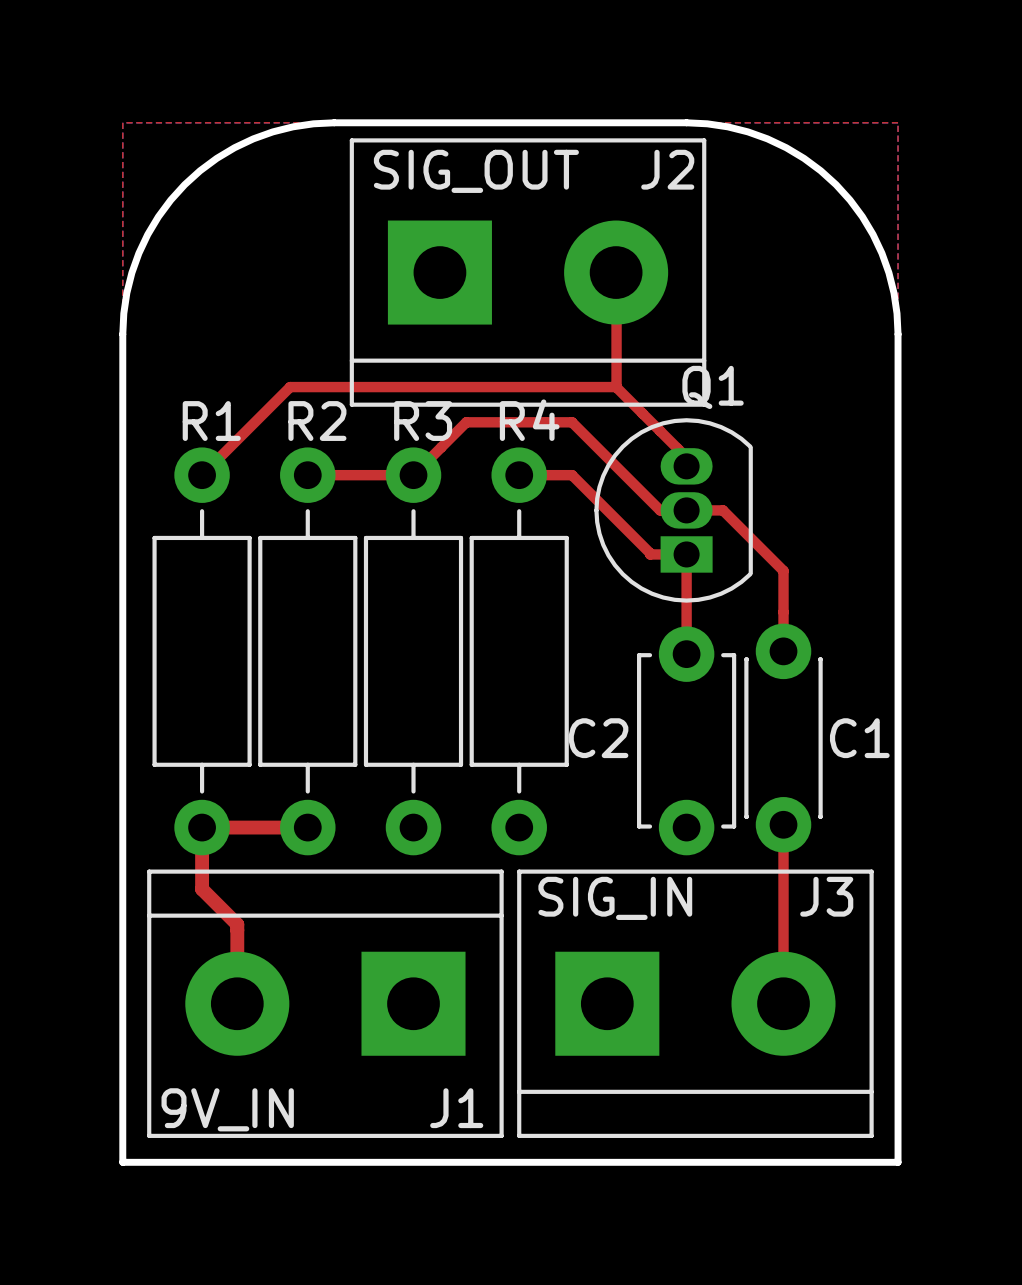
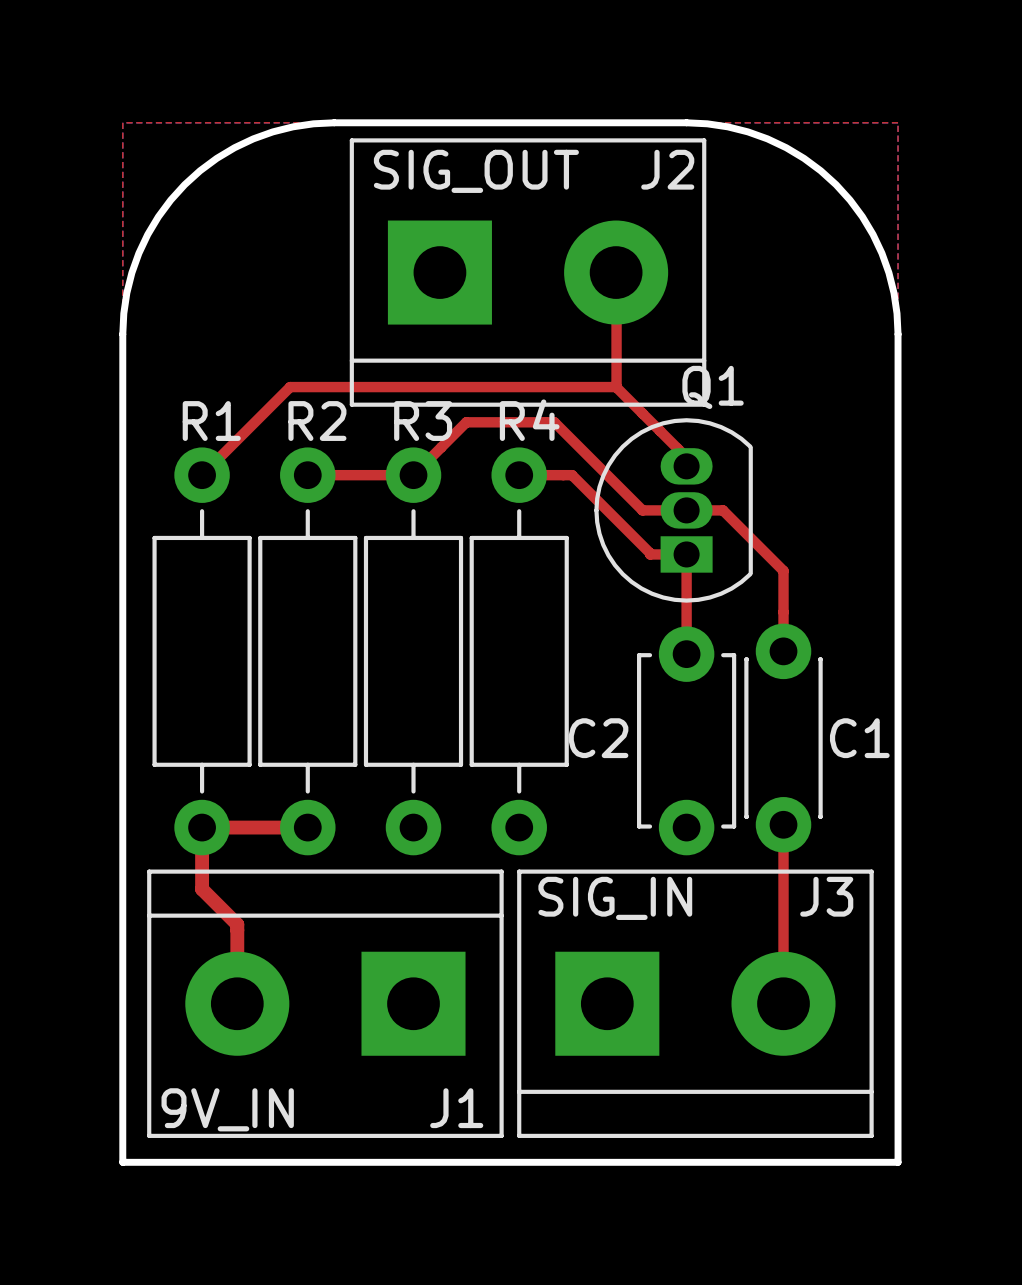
top track: (554, 422) (572, 422) (660, 510) -> (554, 422) (642, 510) (660, 510)

